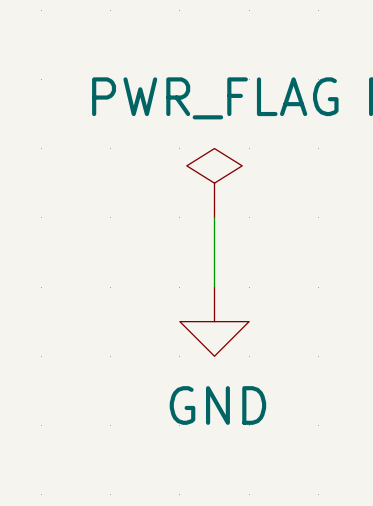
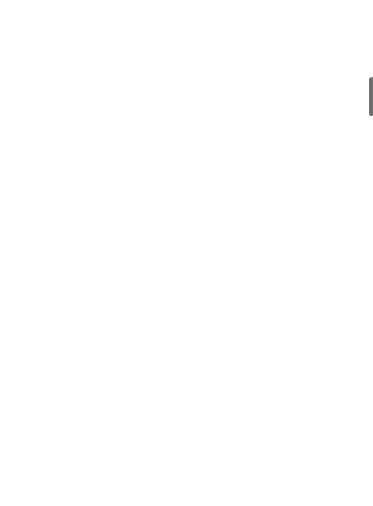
power symbol: PWR_FLAG (214, 183) -> none
wire: (214, 217) (214, 287) -> none
power symbol: GND (214, 321) -> none

